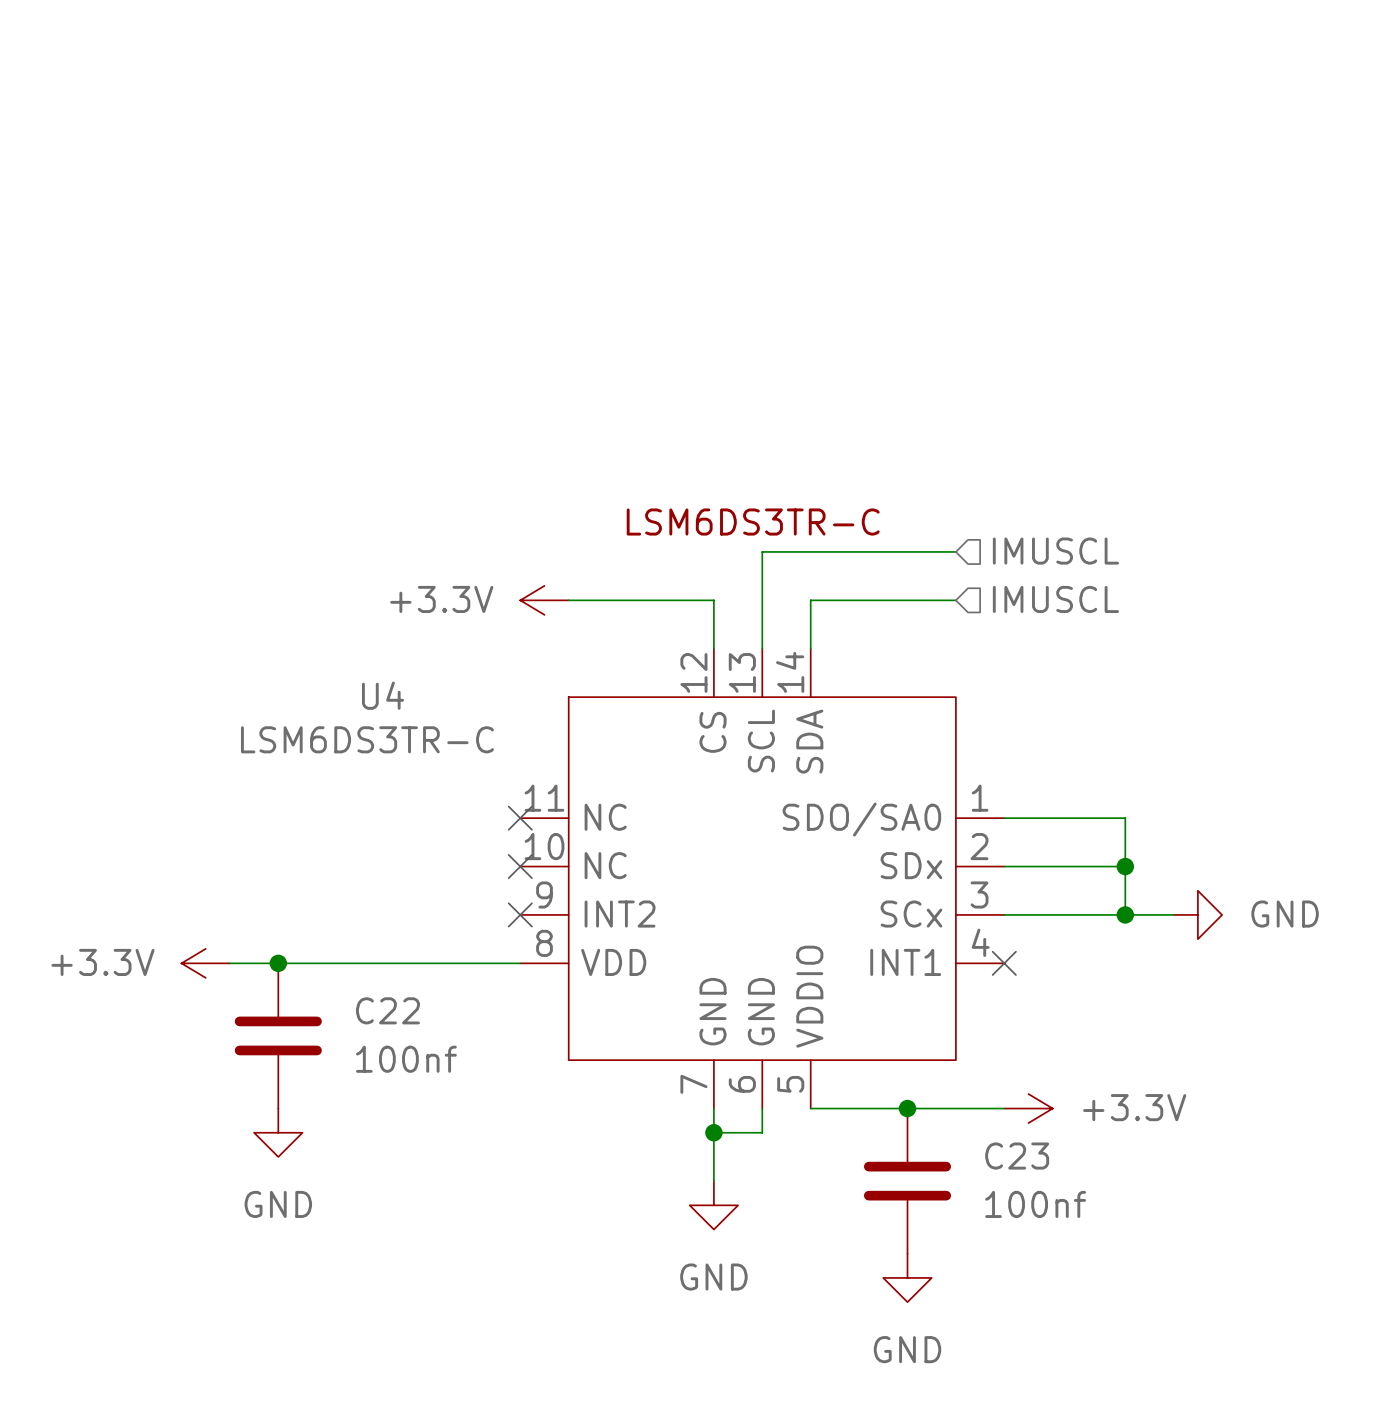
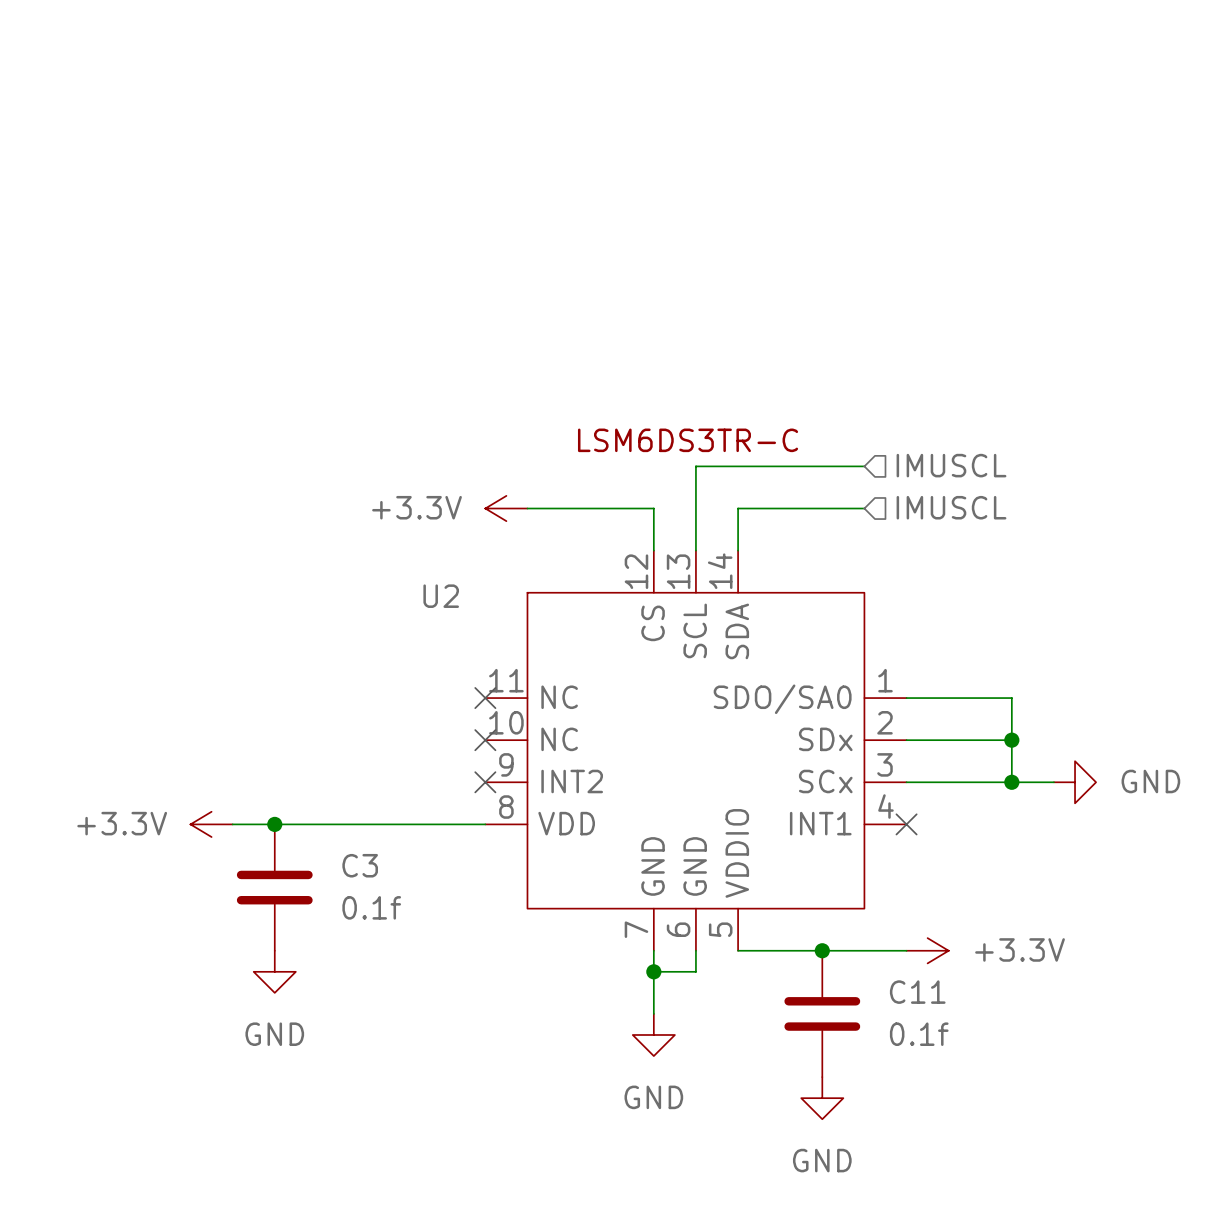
U4 name: U4 (383, 695) -> U2 (441, 596)
U4 value: LSM6DS3TR-C (367, 739) -> none
C22 name: C22 (387, 1010) -> C3 (360, 865)
C22 value: 100nf (406, 1059) -> 0.1f (371, 907)
C23 name: C23 (1017, 1156) -> C11 (917, 992)
C23 value: 100nf (1035, 1204) -> 0.1f (919, 1034)

